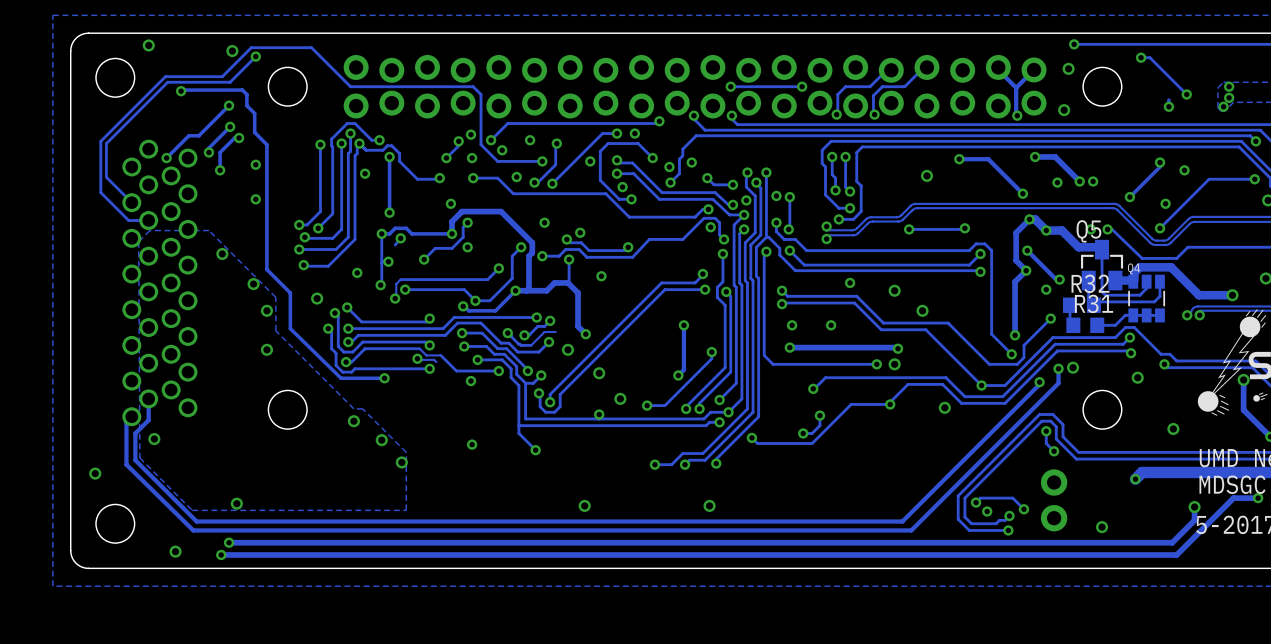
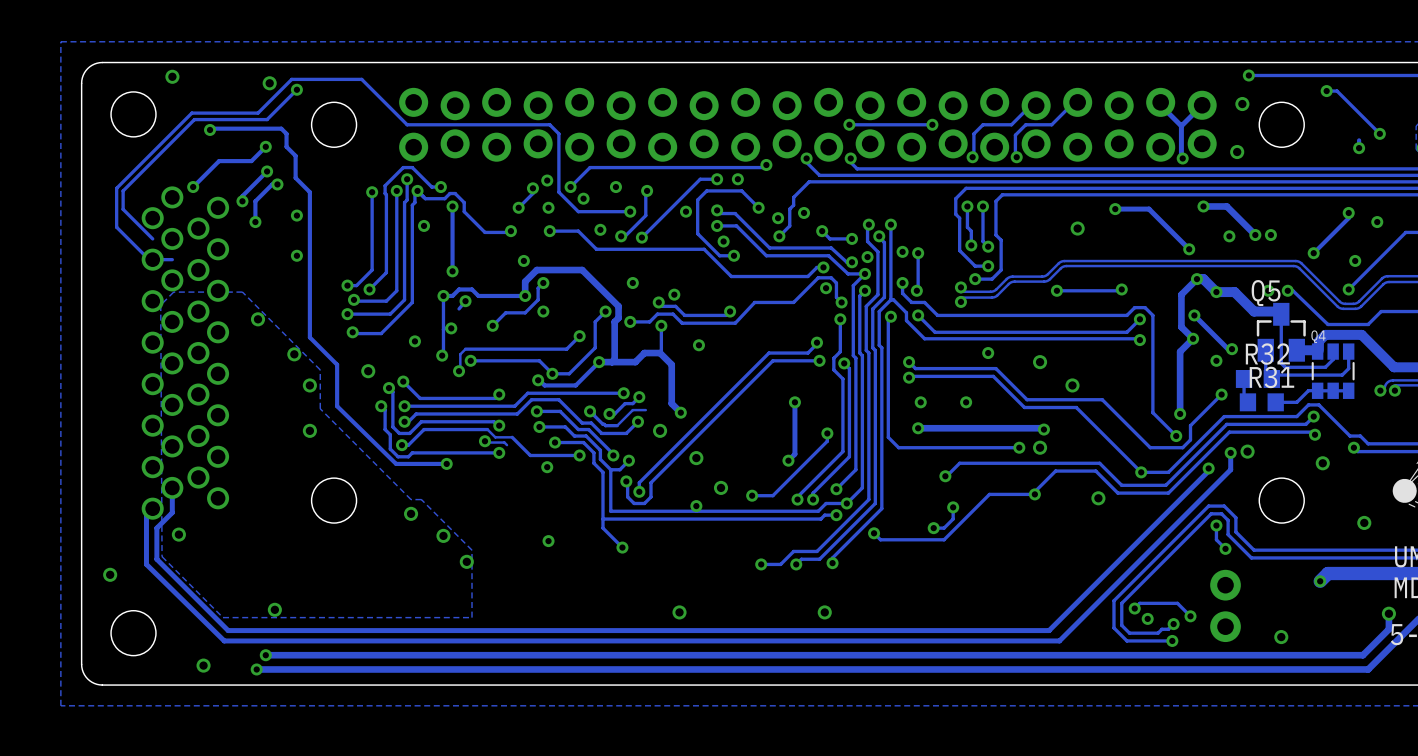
track: (216, 117) (198, 135) (188, 135) (166, 158) -> (251, 161) (219, 161) (193, 187)
via position: (166, 158) -> (193, 187)
track: (106, 159) (106, 177) (131, 202) -> (123, 209) (152, 238)
track: (100, 174) (100, 192) (128, 220) (148, 220) -> (116, 227) (149, 259) (172, 259)

